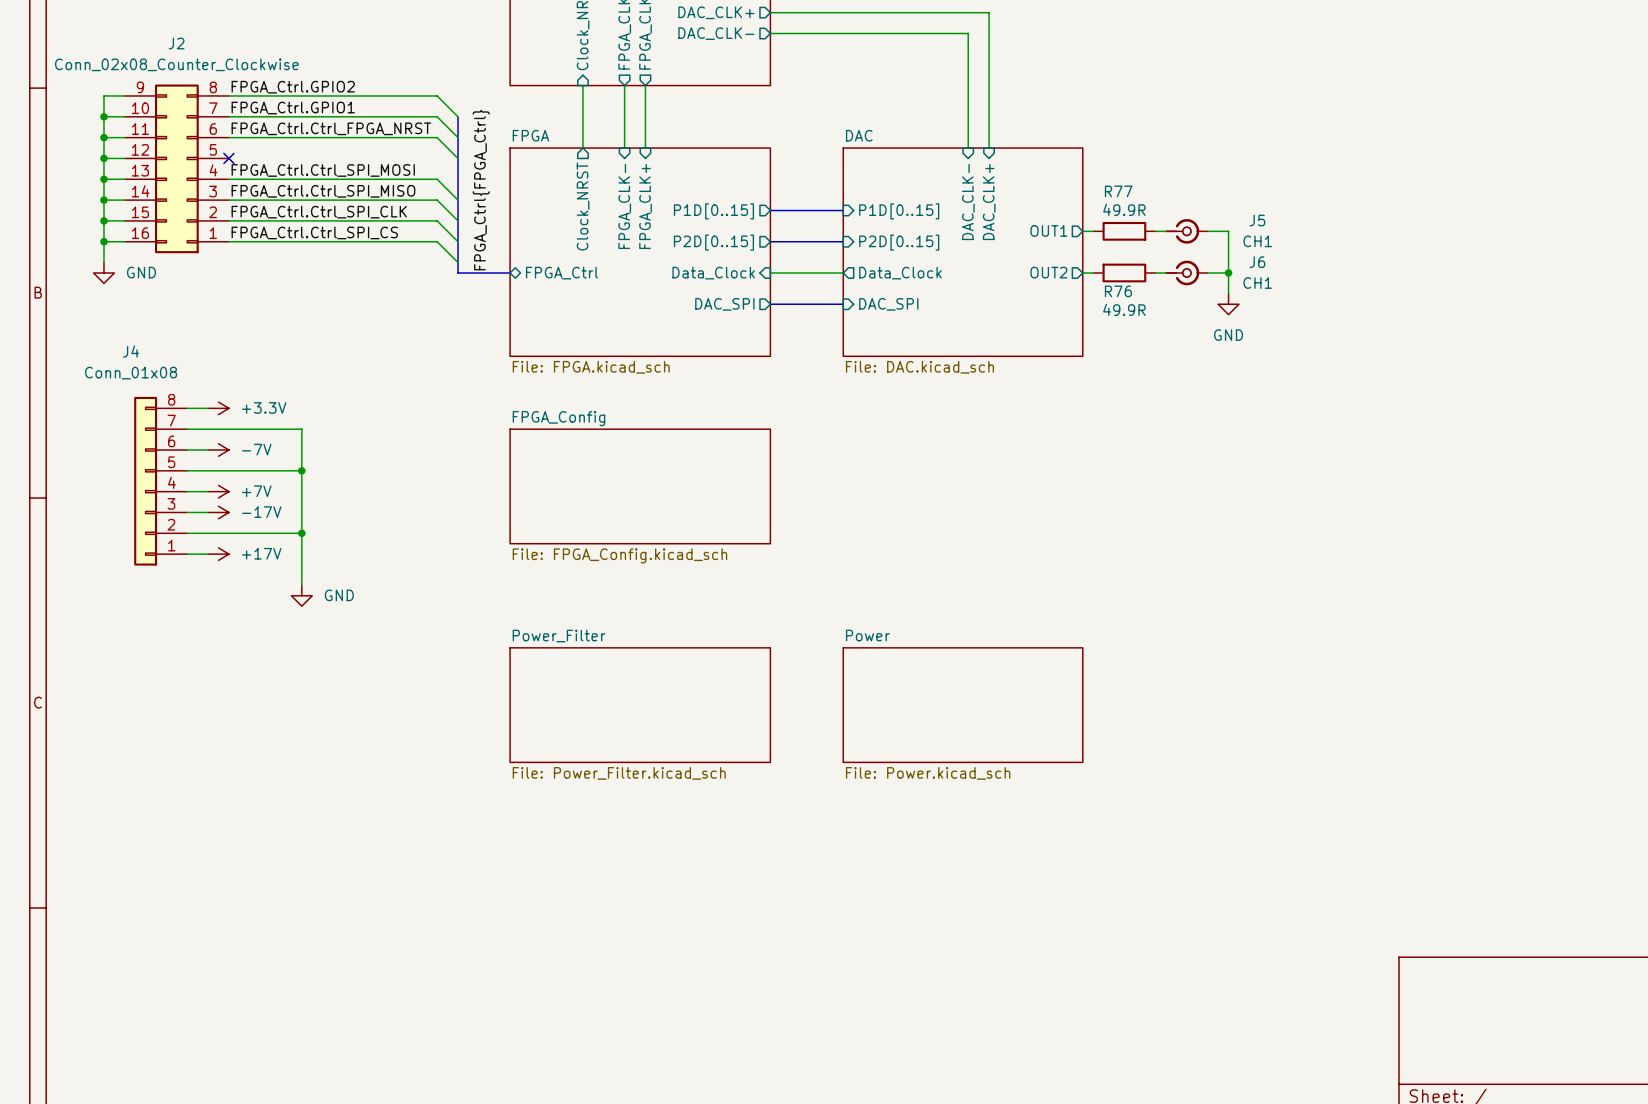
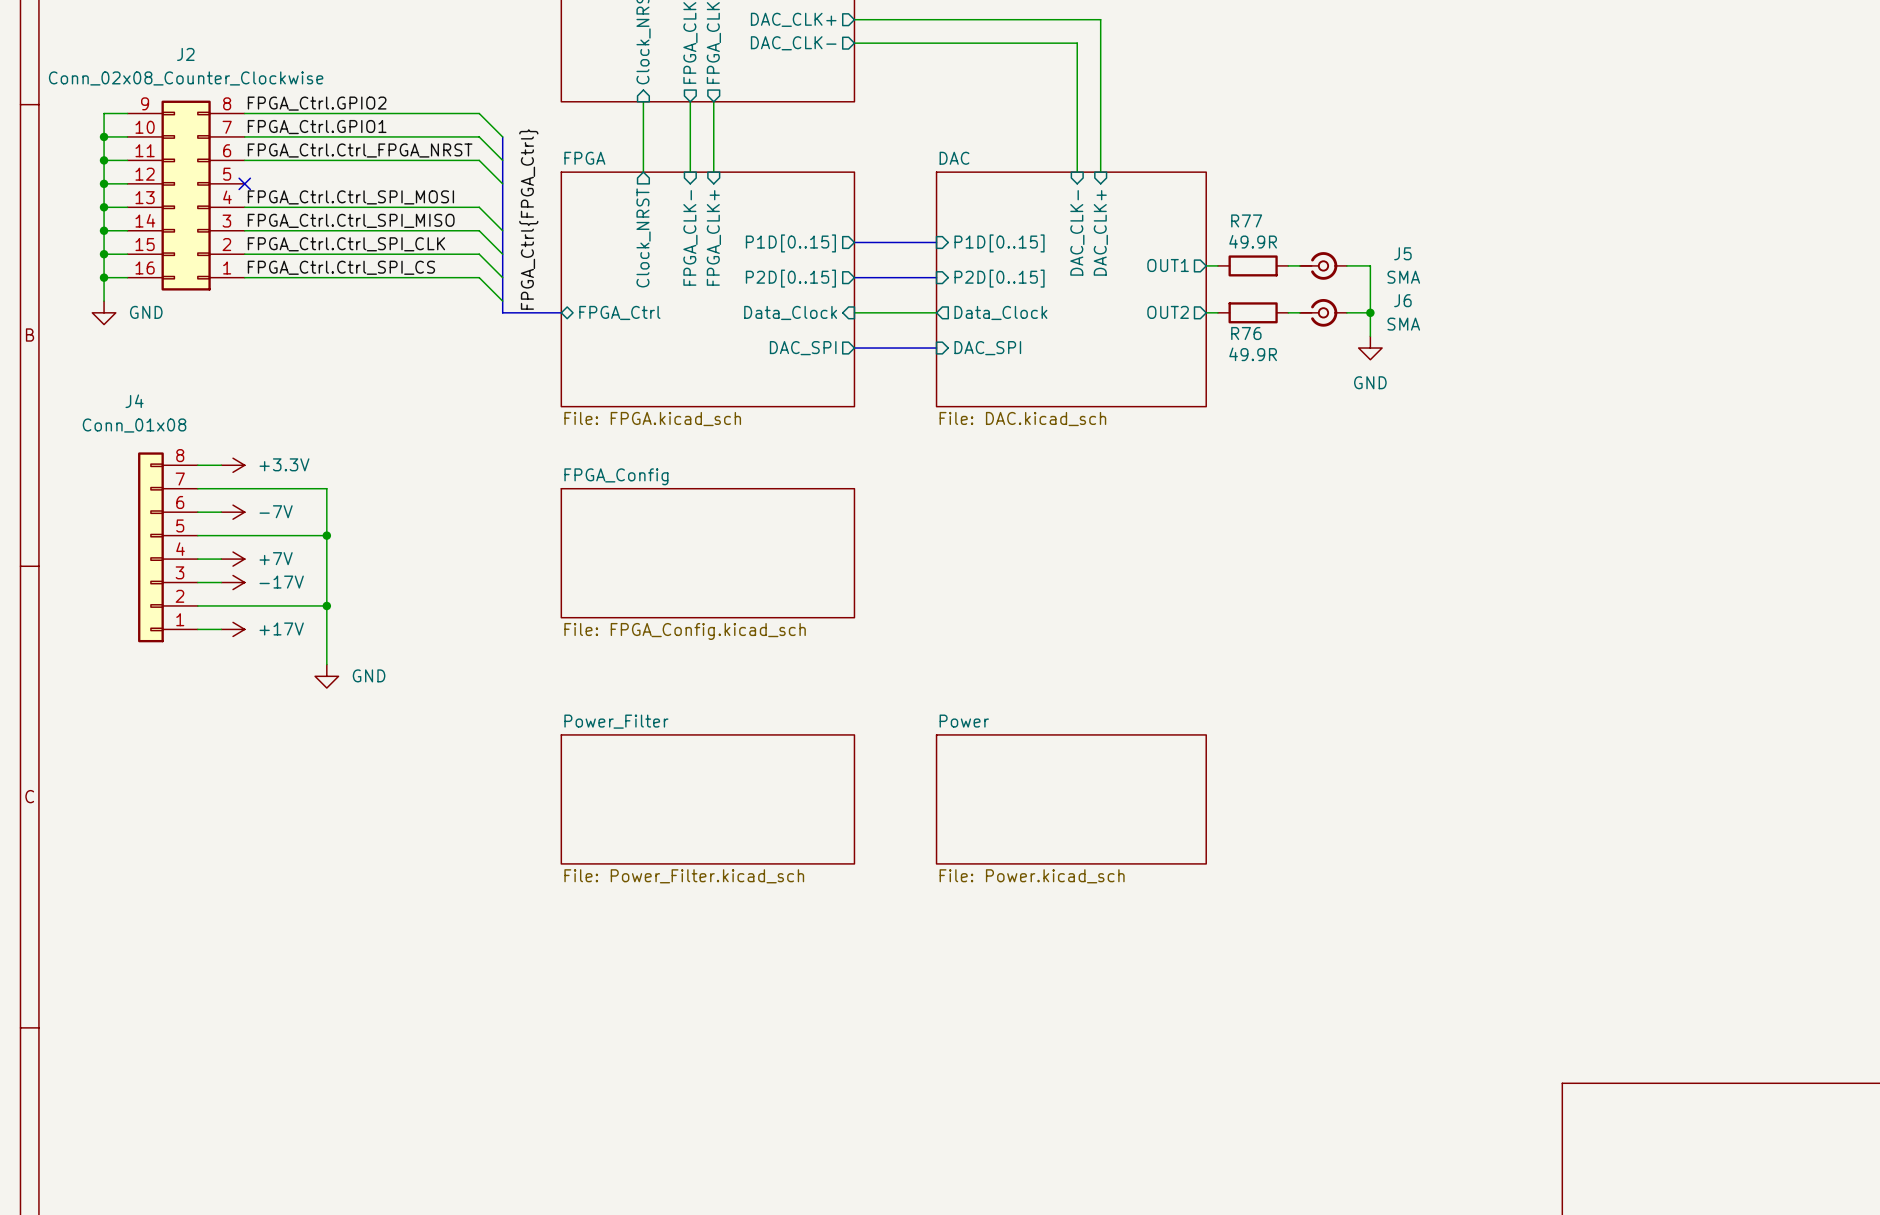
J5 value: CH1 (1257, 241) -> SMA (1403, 277)
J6 value: CH1 (1257, 283) -> SMA (1403, 324)

